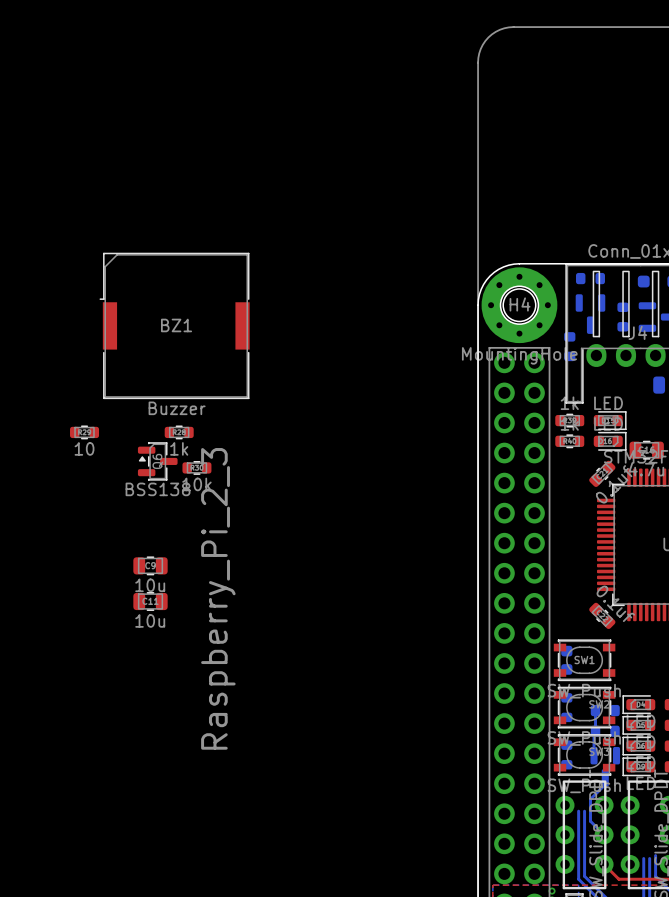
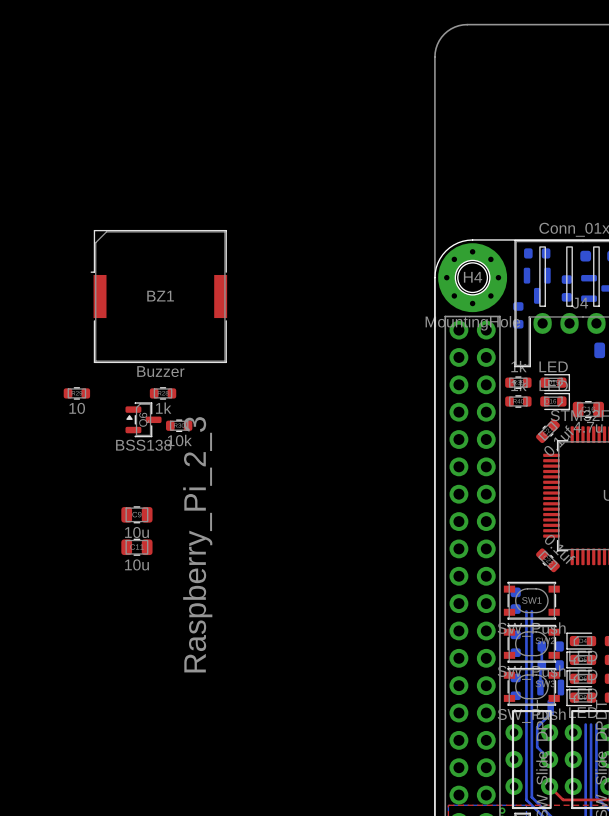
bottom track: none -> (526, 611) (526, 738)
bottom track: none -> (531, 611) (531, 738)
bottom track: none -> (585, 724) (585, 781)
bottom track: none -> (591, 724) (591, 781)
bottom track: none -> (596, 724) (596, 778)

